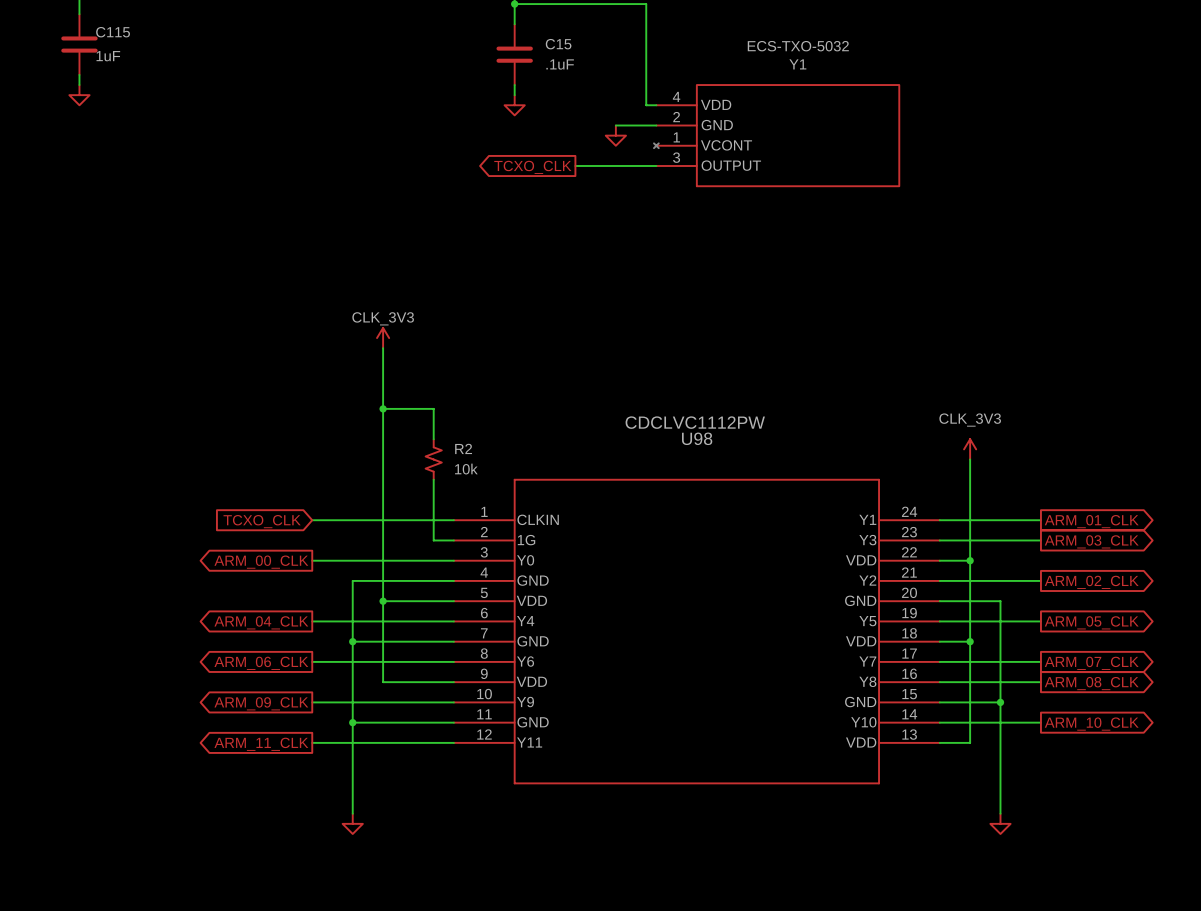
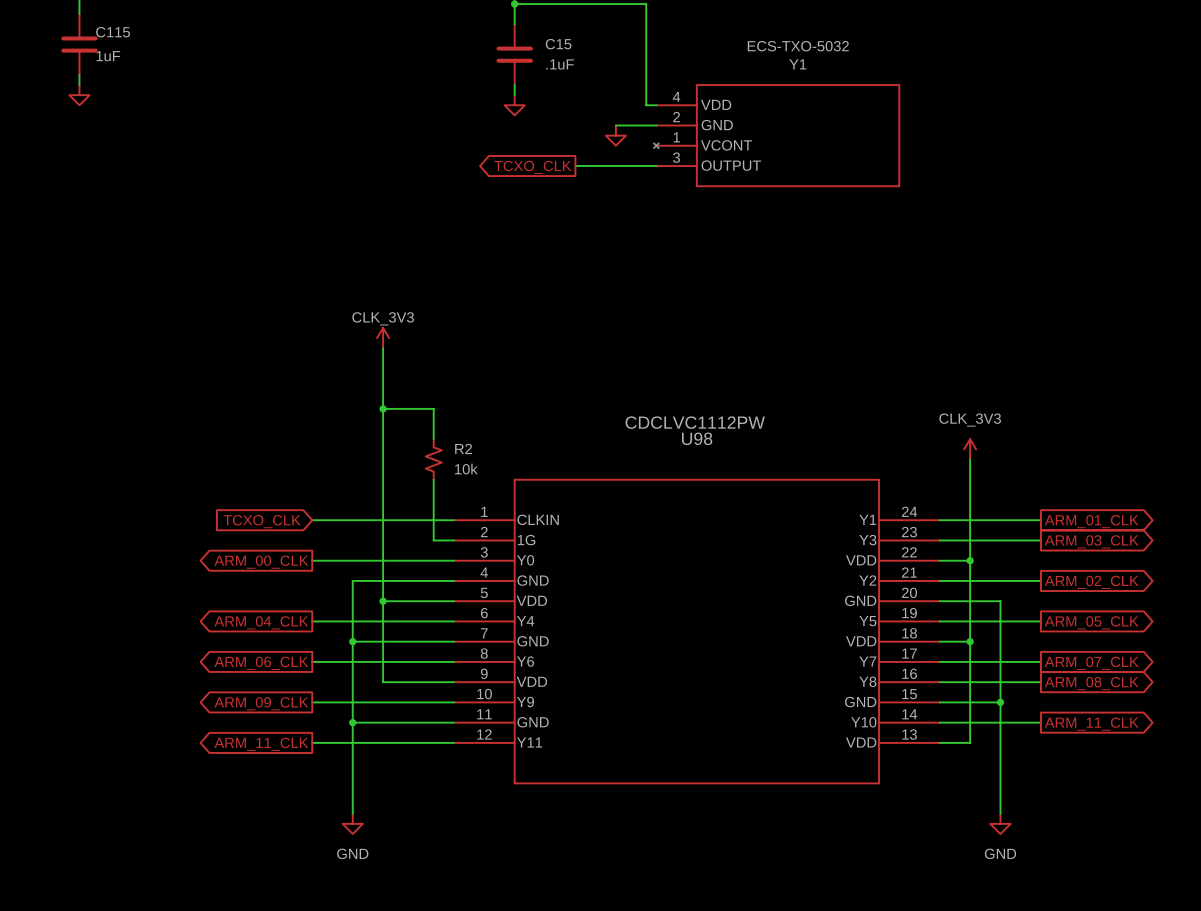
global label: ARM_10_CLK (1091, 724) -> ARM_11_CLK (1091, 724)
power symbol text: none -> GND (352, 853)
power symbol text: none -> GND (1000, 853)

